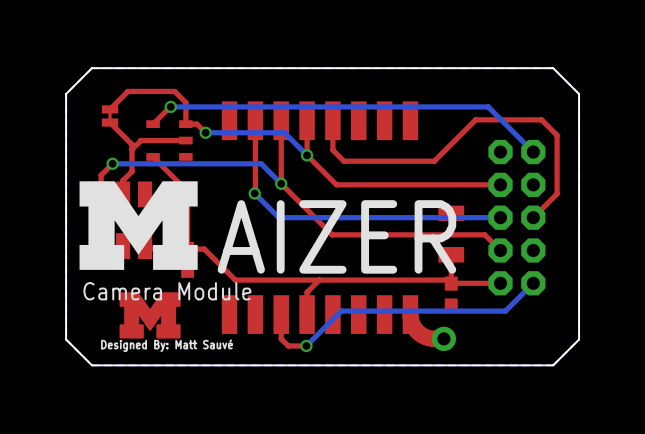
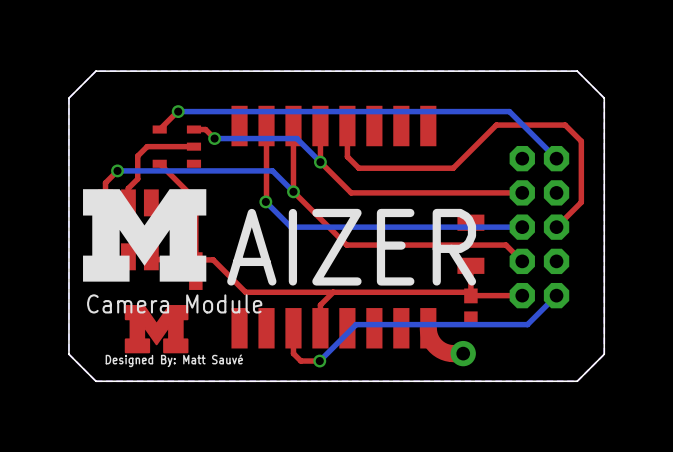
top track: (110, 109) (128, 91) (174, 91) (185, 102) (185, 124) -> none
part: (110, 115) -> none
top track: (110, 122) (132, 144) (132, 149) -> none

